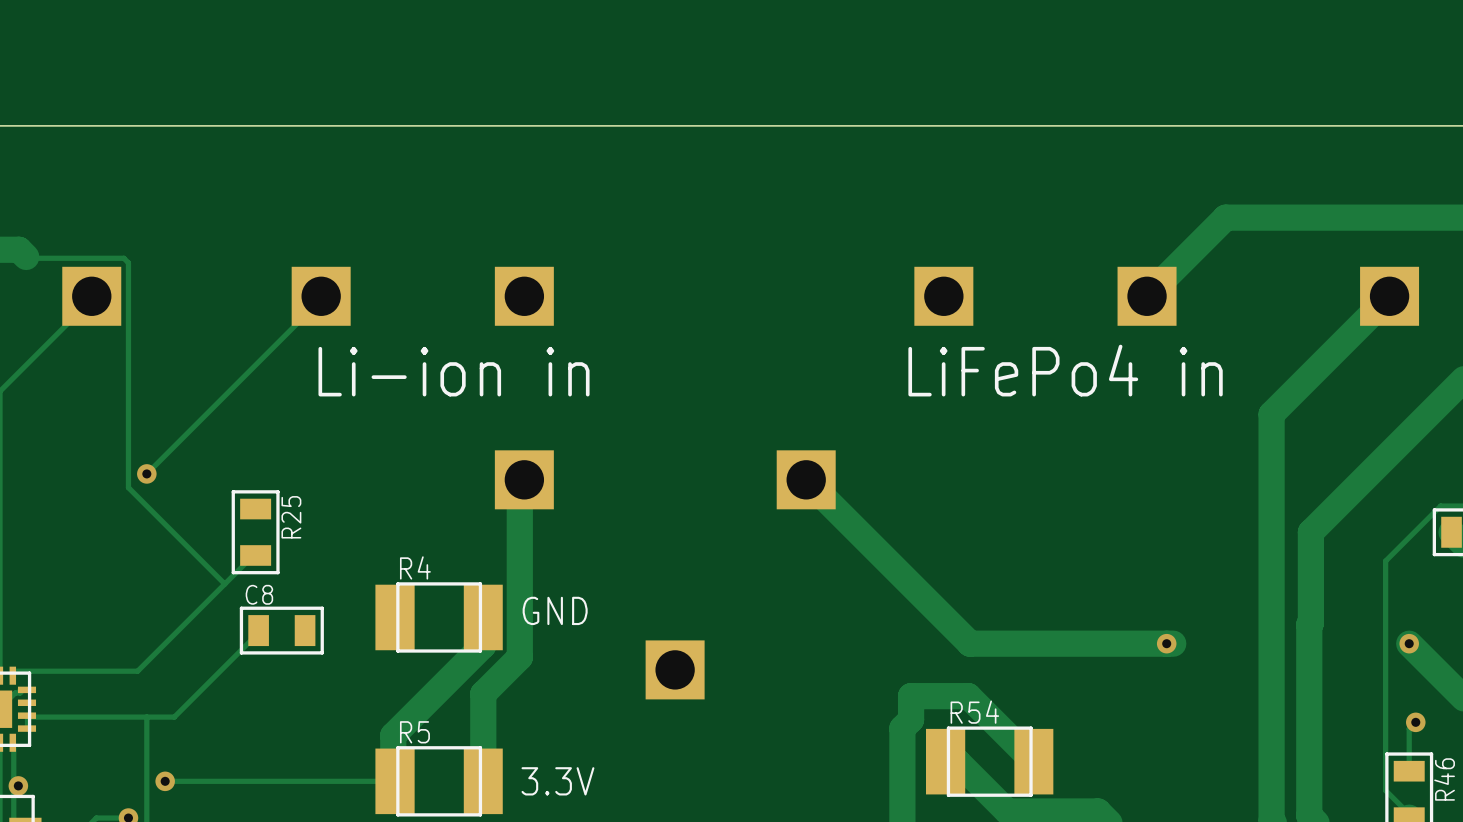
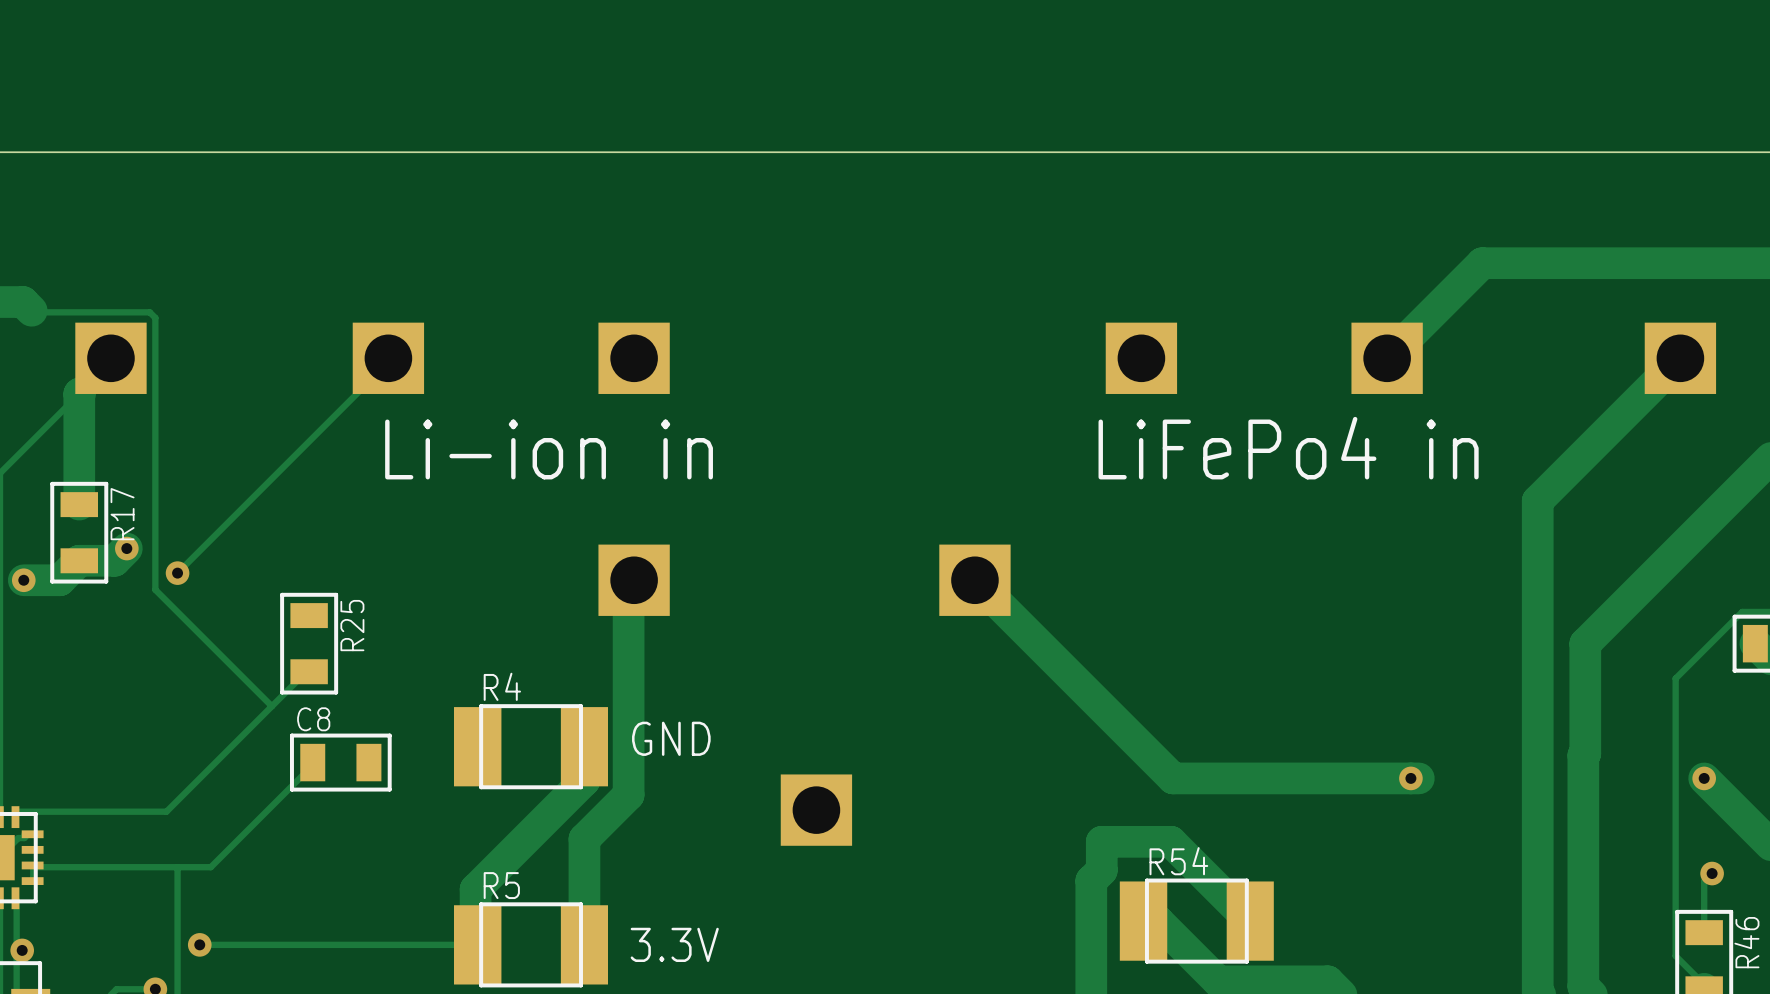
track: none -> (80, 393) (79, 504)
R17: none -> (79, 532)
track: none -> (126, 548) (114, 560) (79, 560) (59, 580) (23, 580)
via: none -> (126, 548)
via: none -> (23, 580)

